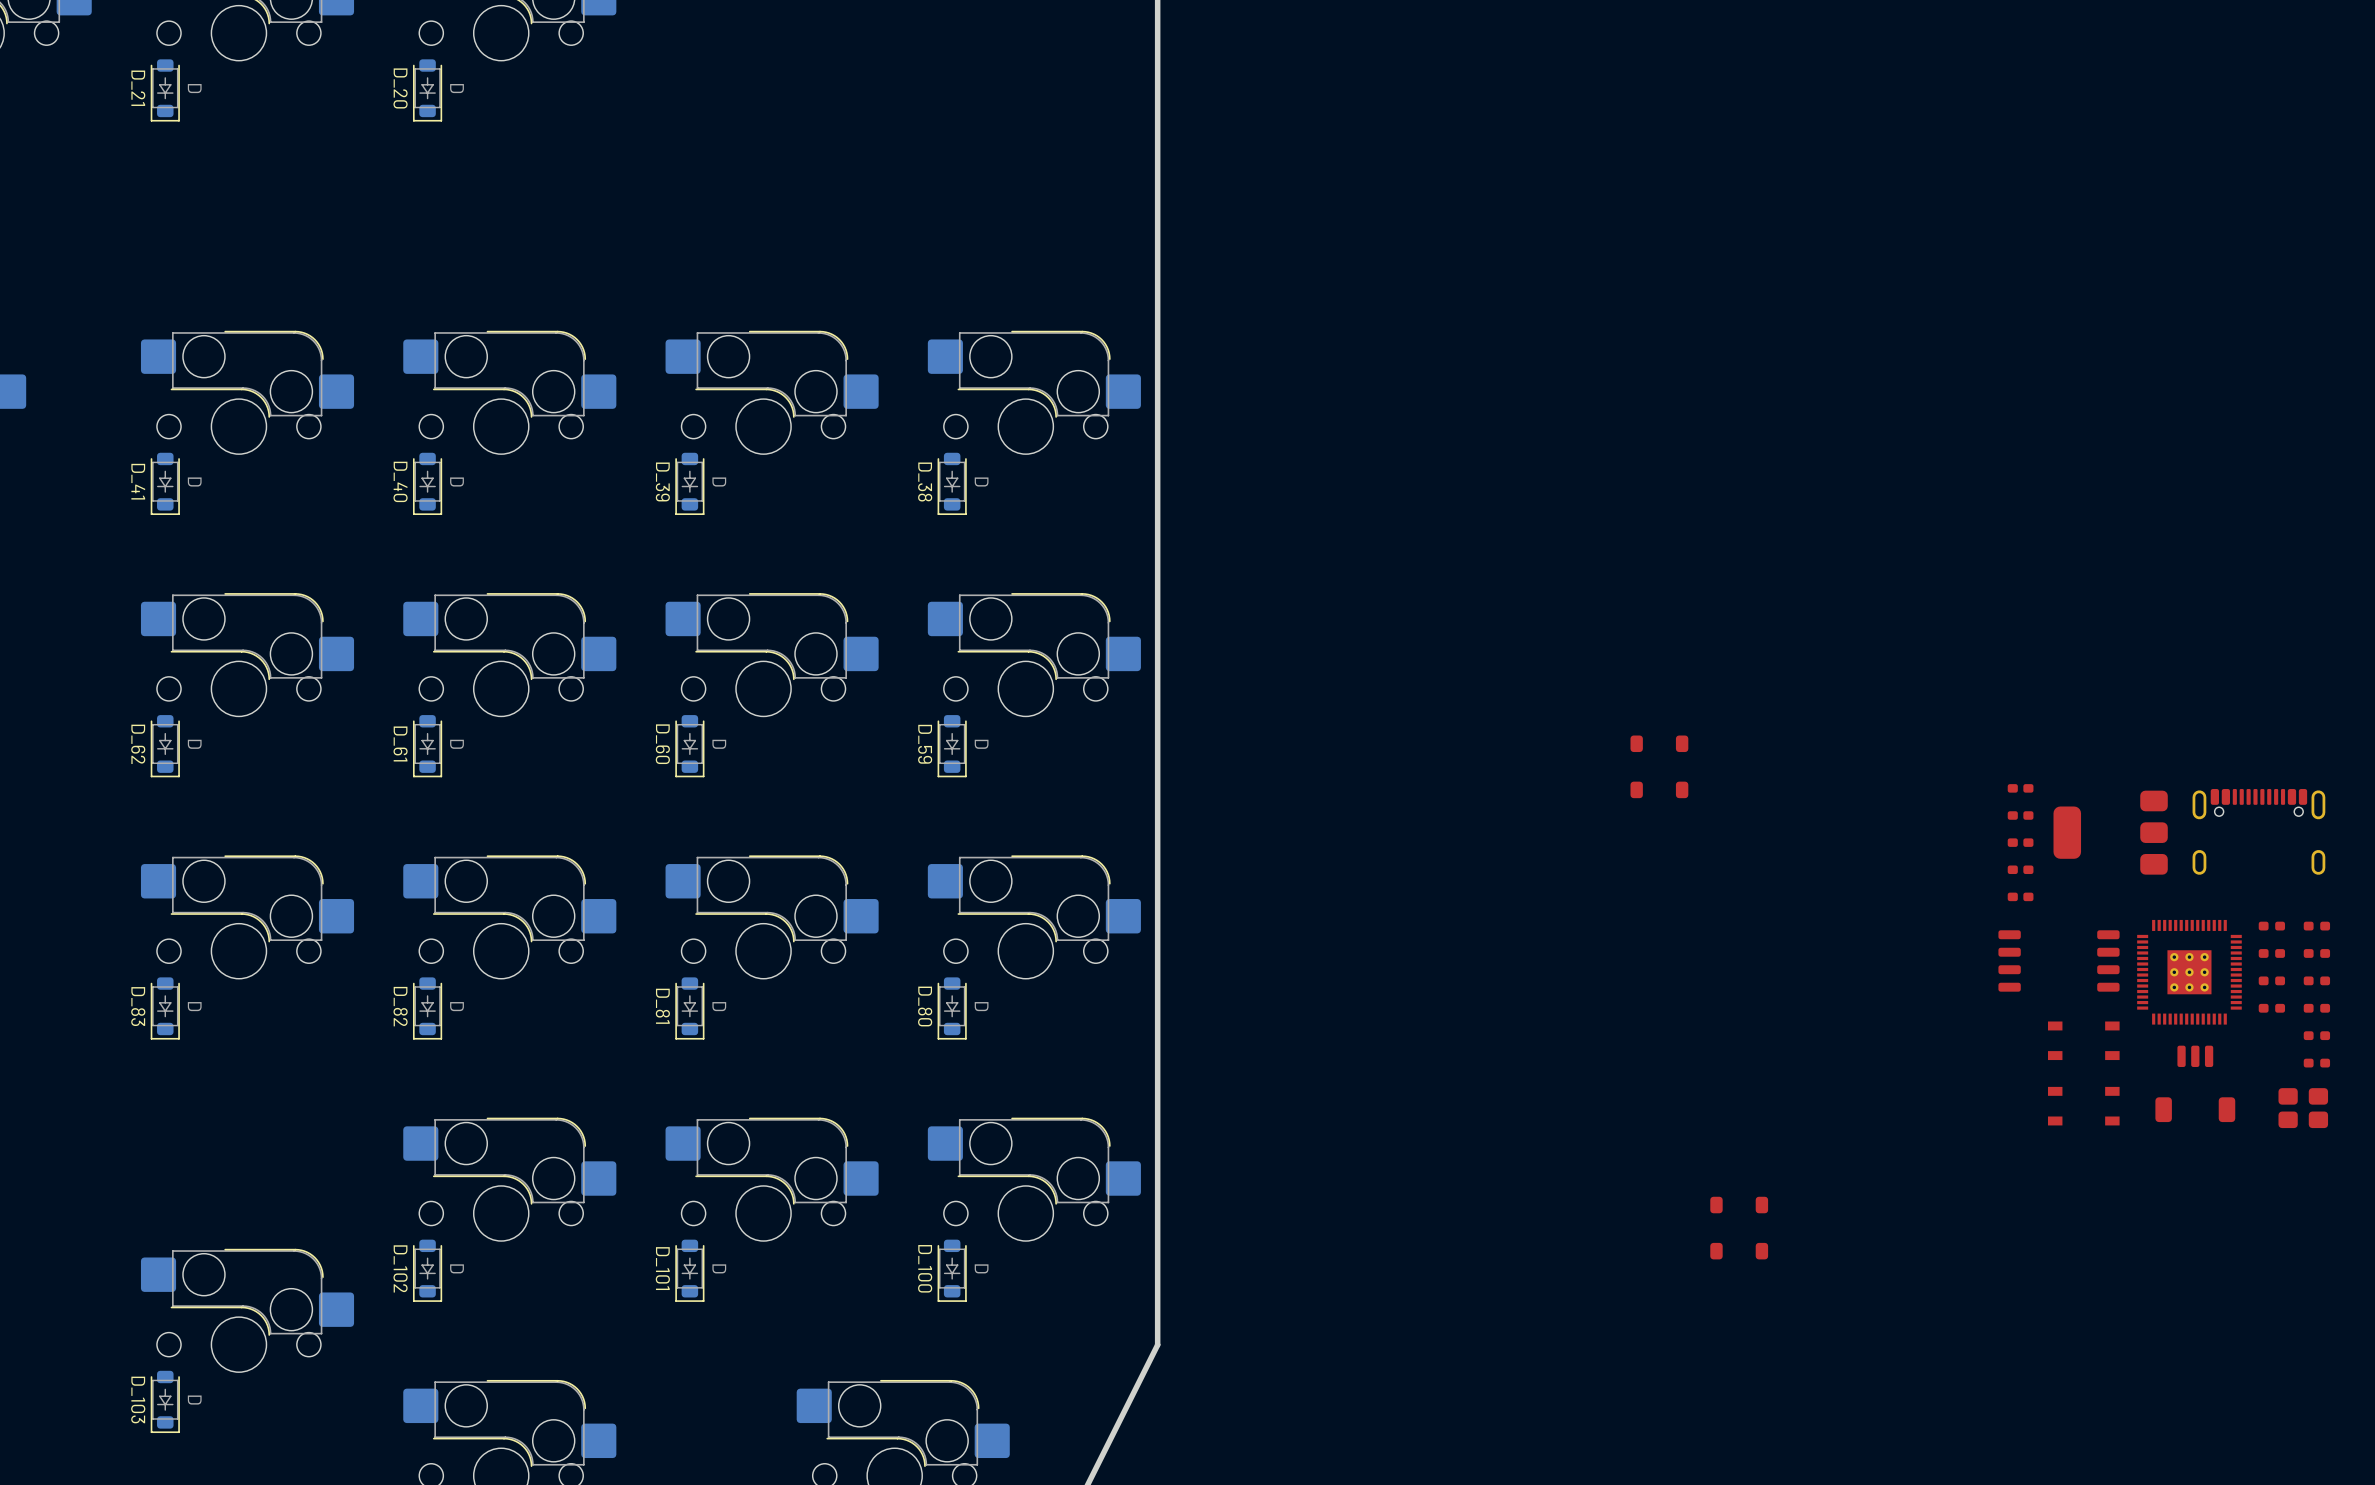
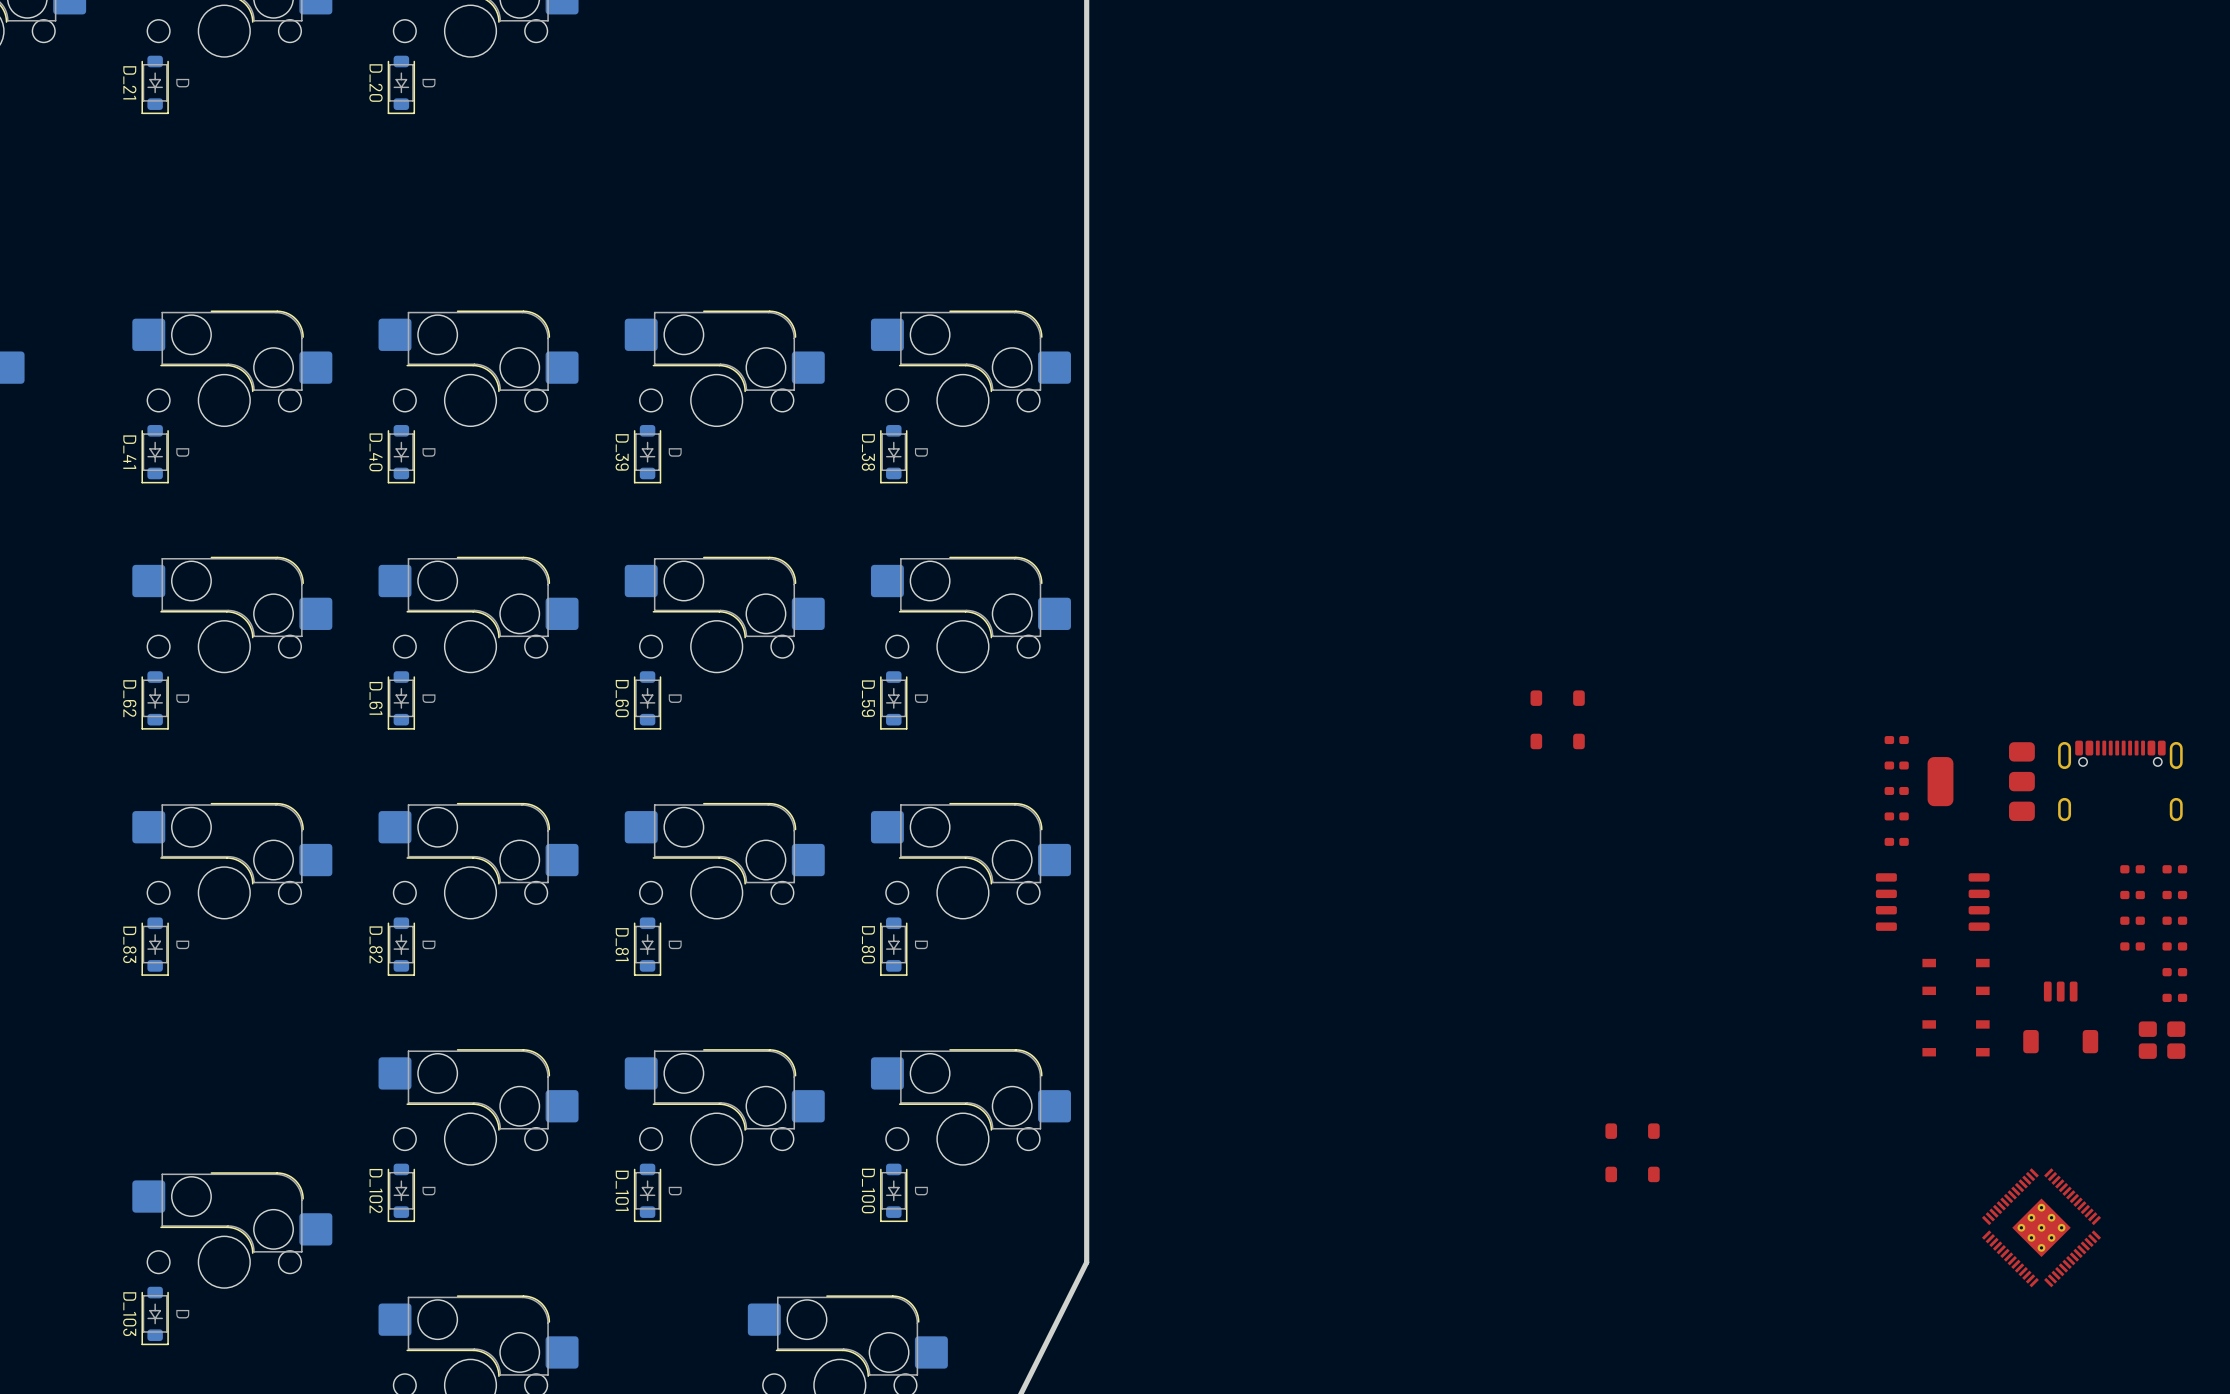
part: (2189, 972) -> none
part: none -> (2041, 1227)

